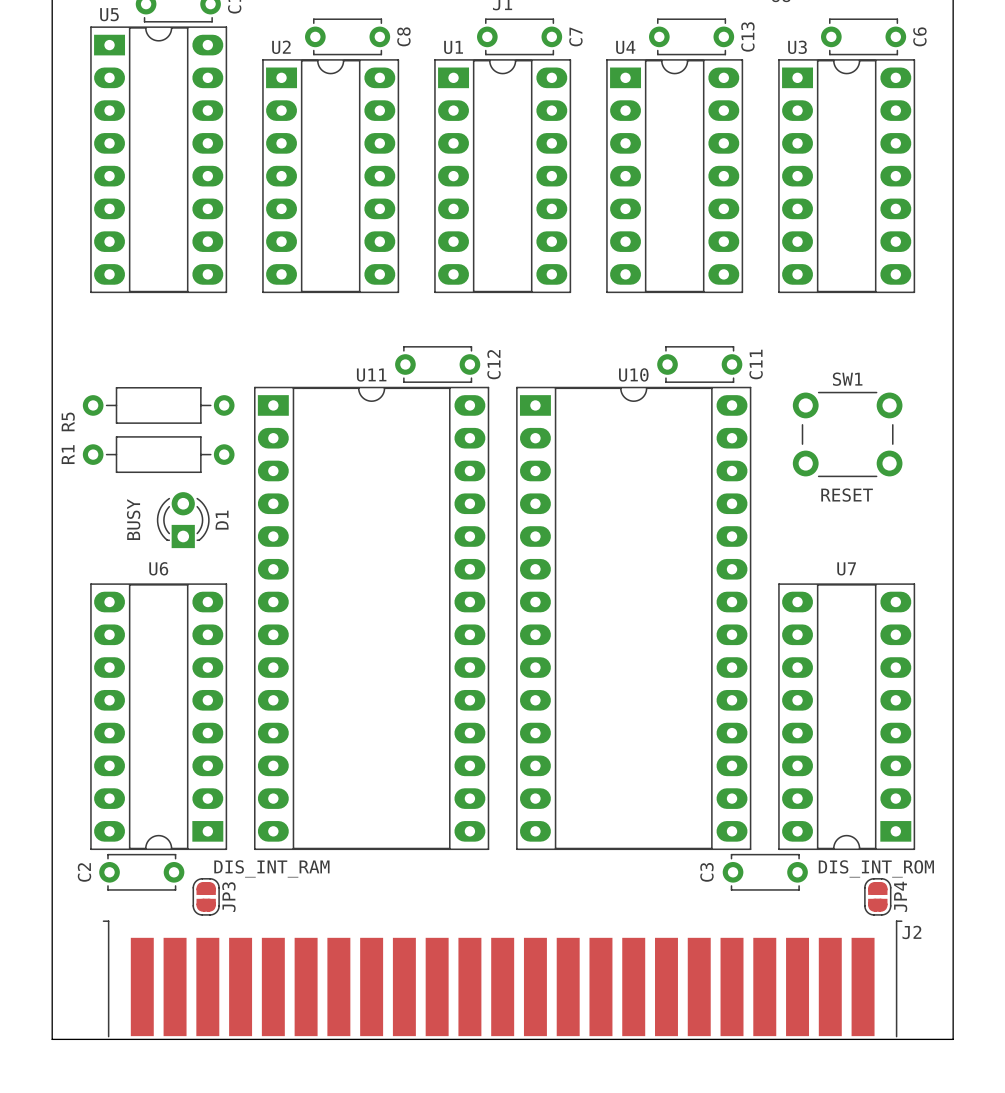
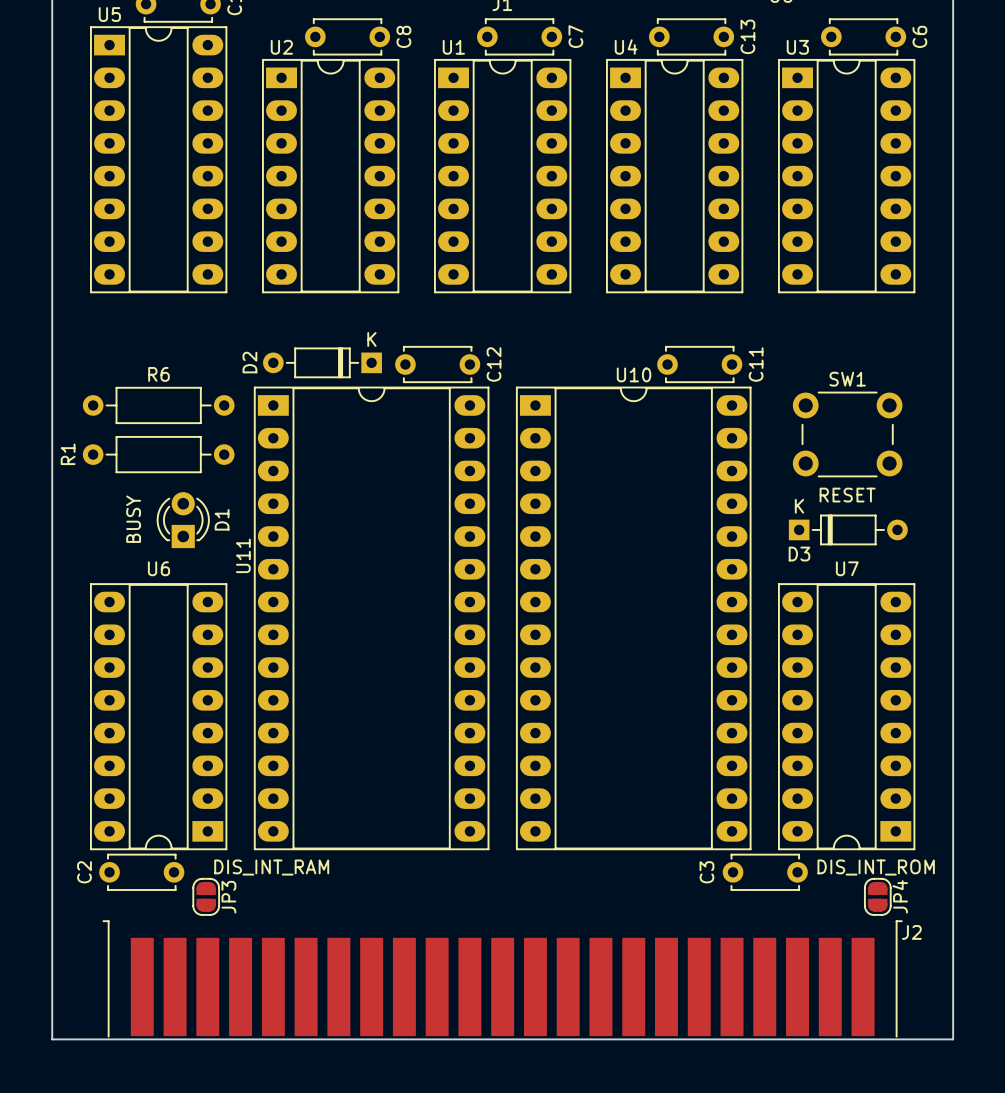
D2: none -> (322, 362)
U11 name rotation: 0° (371, 375) -> 90° counterclockwise (243, 555)
U11 name position: U11 (371, 375) -> U11 (243, 555)
R5 name: R5 (68, 421) -> R6 (158, 374)
D3: none -> (848, 529)

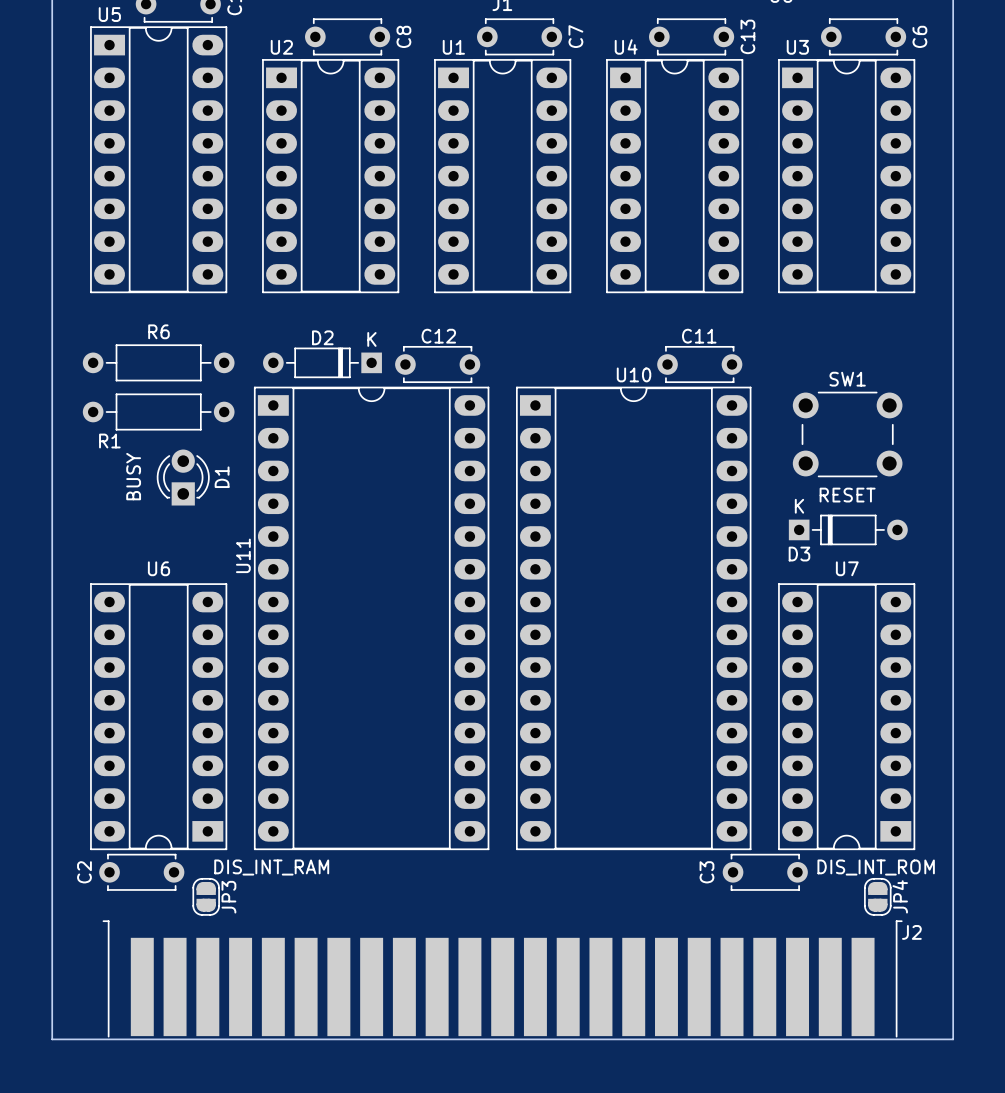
D2 name rotation: 0° (249, 362) -> 90° clockwise (322, 337)
D2 name position: D2 (249, 362) -> D2 (322, 337)
C12 name rotation: 0° (494, 364) -> 90° clockwise (438, 336)
C12 name position: C12 (494, 364) -> C12 (438, 336)
C11 name rotation: 0° (756, 364) -> 90° clockwise (699, 336)
C11 name position: C11 (756, 364) -> C11 (699, 336)
R6 position: (158, 405) -> (158, 362)
R1 name rotation: 0° (68, 454) -> 90° clockwise (109, 441)
R1 name position: R1 (68, 454) -> R1 (109, 441)
R1 position: (158, 454) -> (158, 412)
text position: BUSY (133, 519) -> BUSY (133, 476)
D1 position: (183, 520) -> (183, 477)

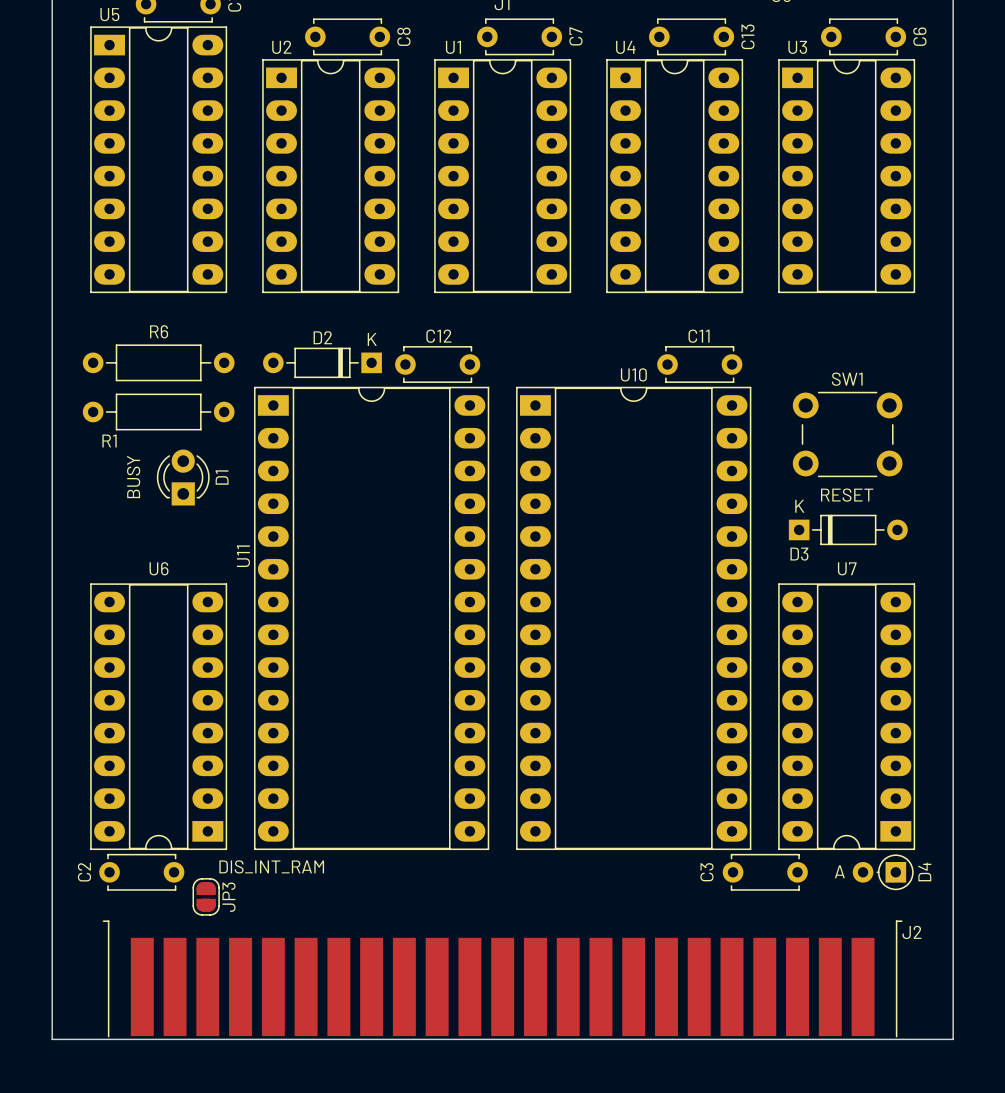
text: DIS_INT_ROM (876, 867) -> none
D4: none -> (883, 872)
JP4: (877, 896) -> none

